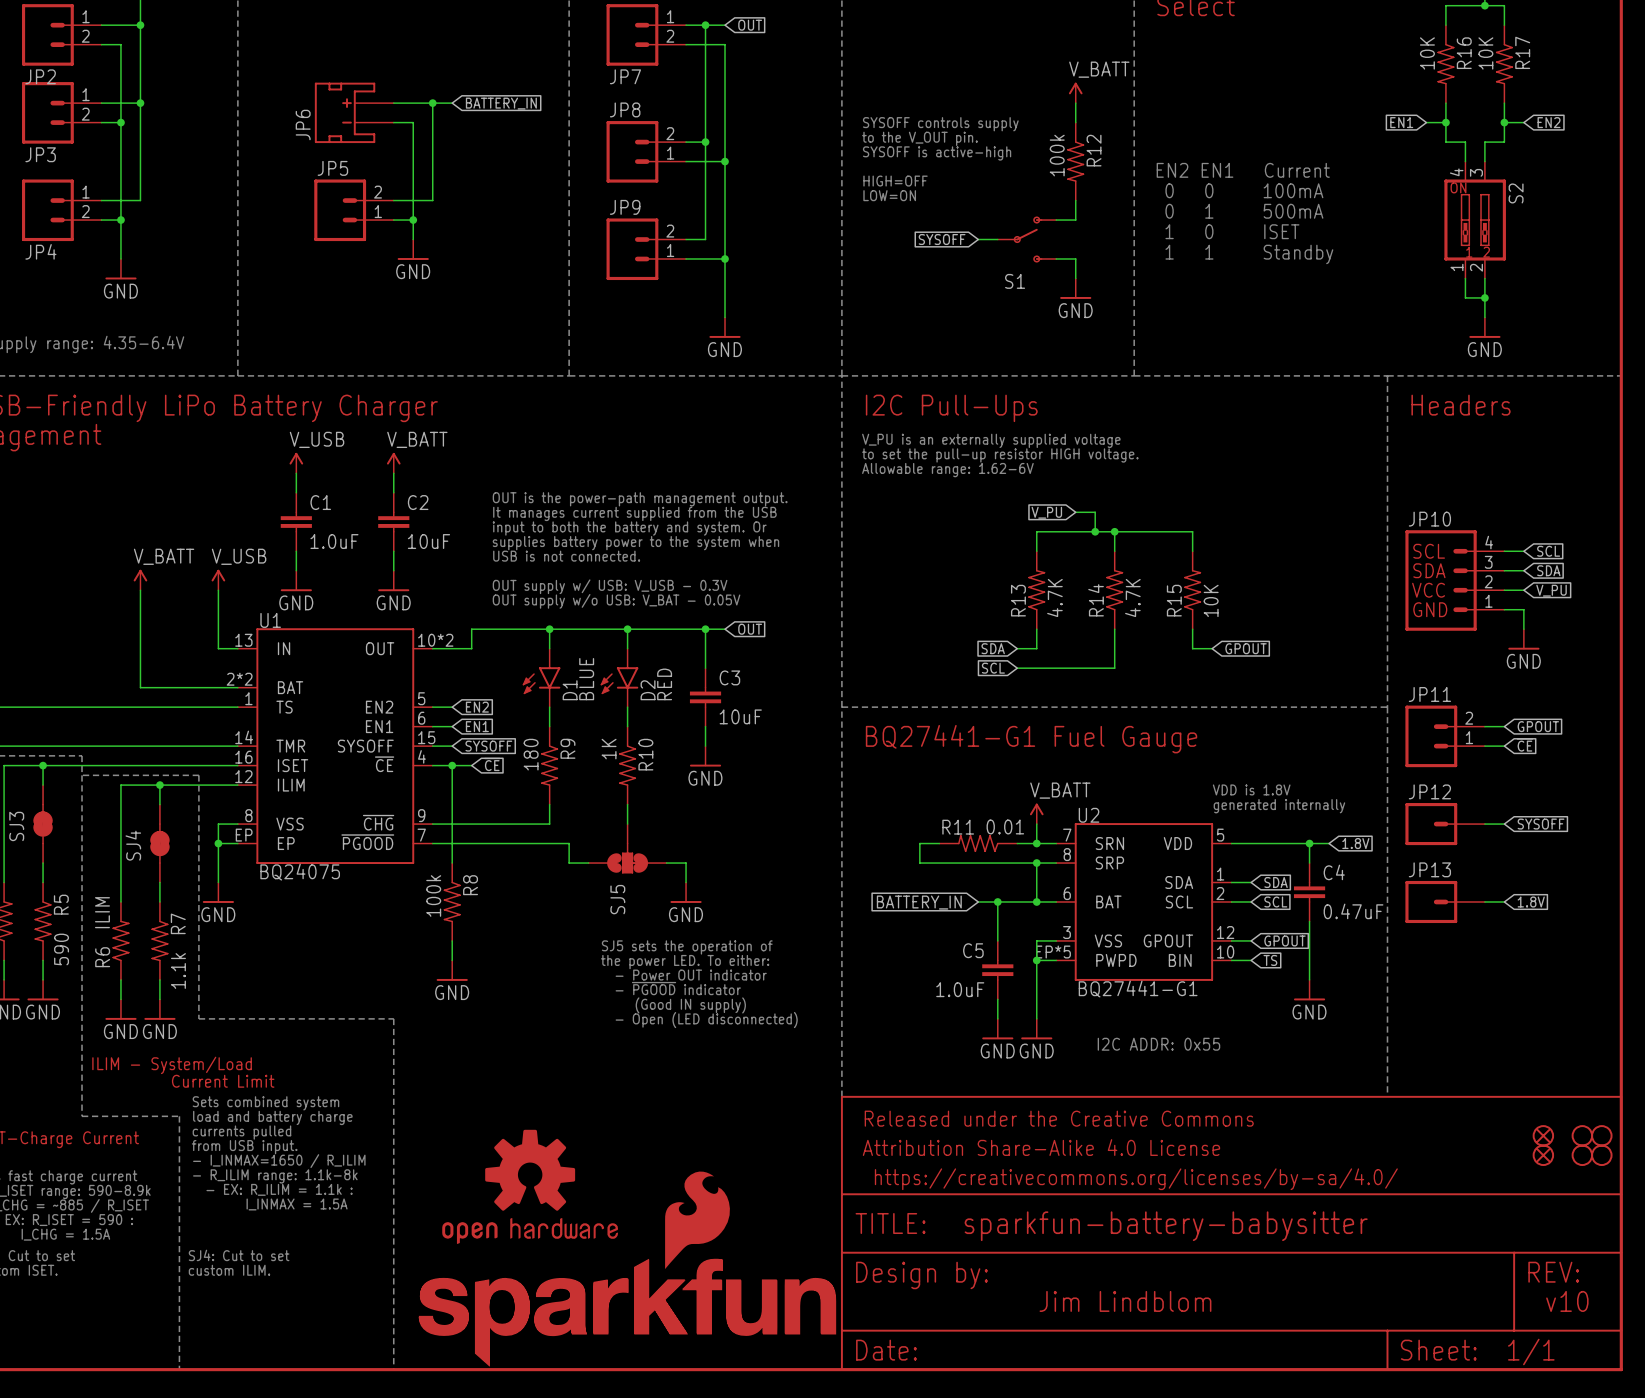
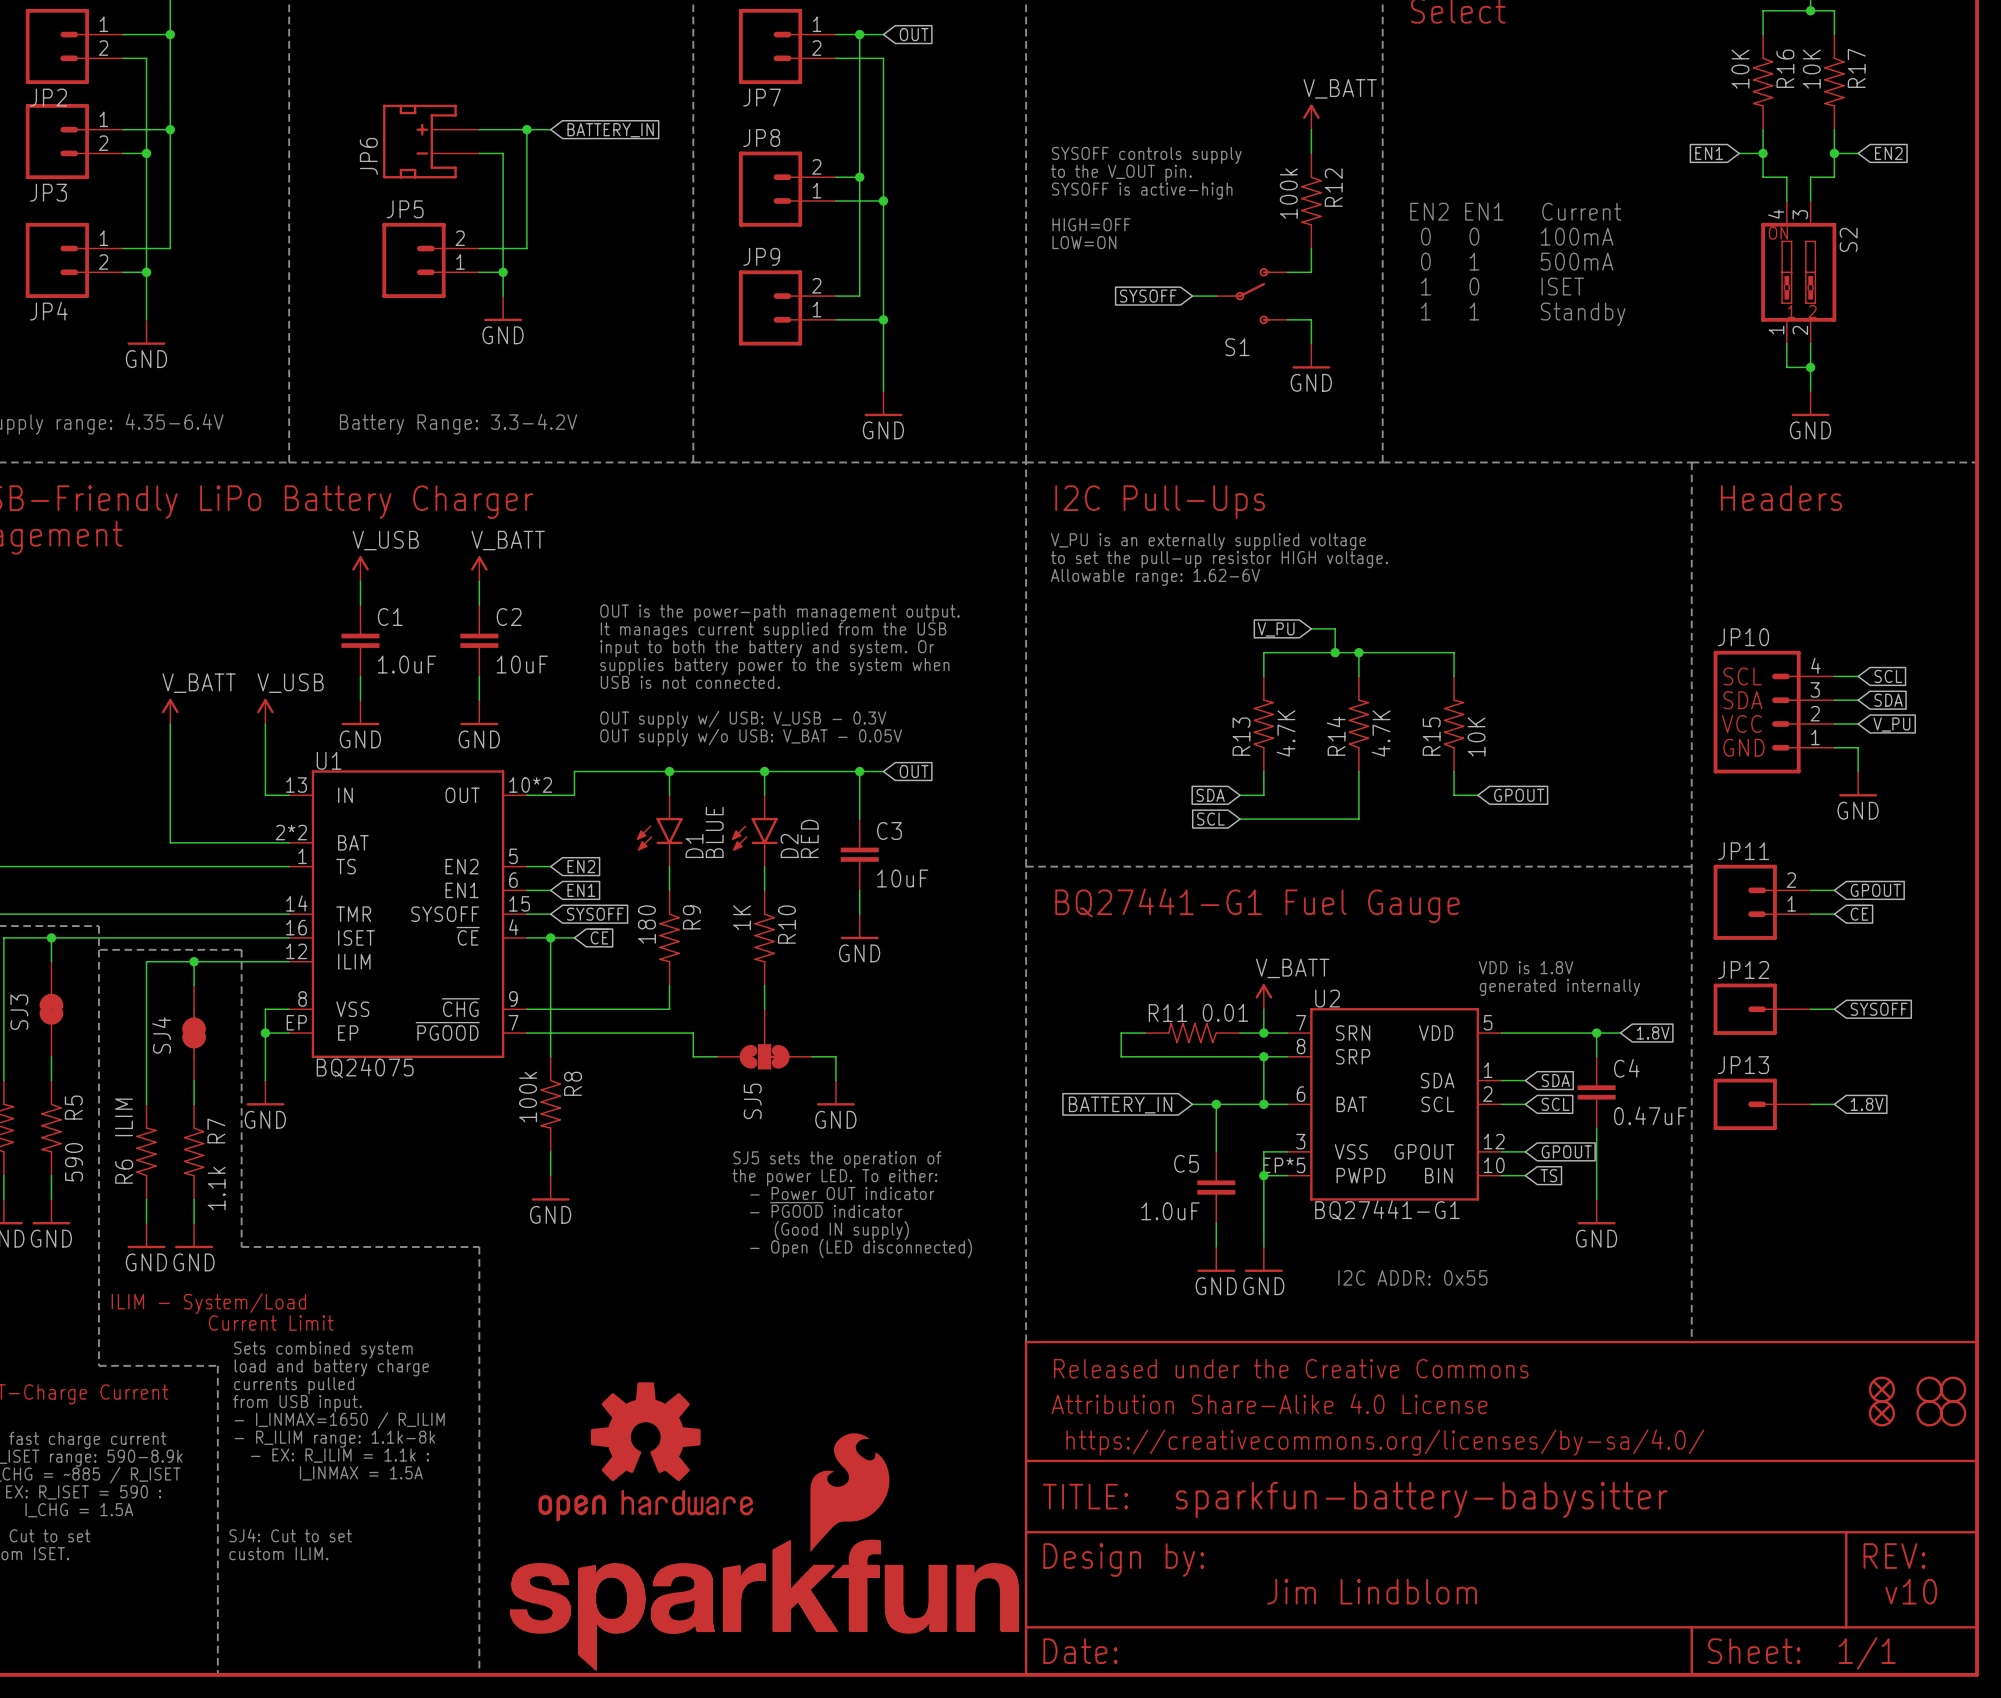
text: none -> Battery Range: 3.3-4.2V (458, 424)

